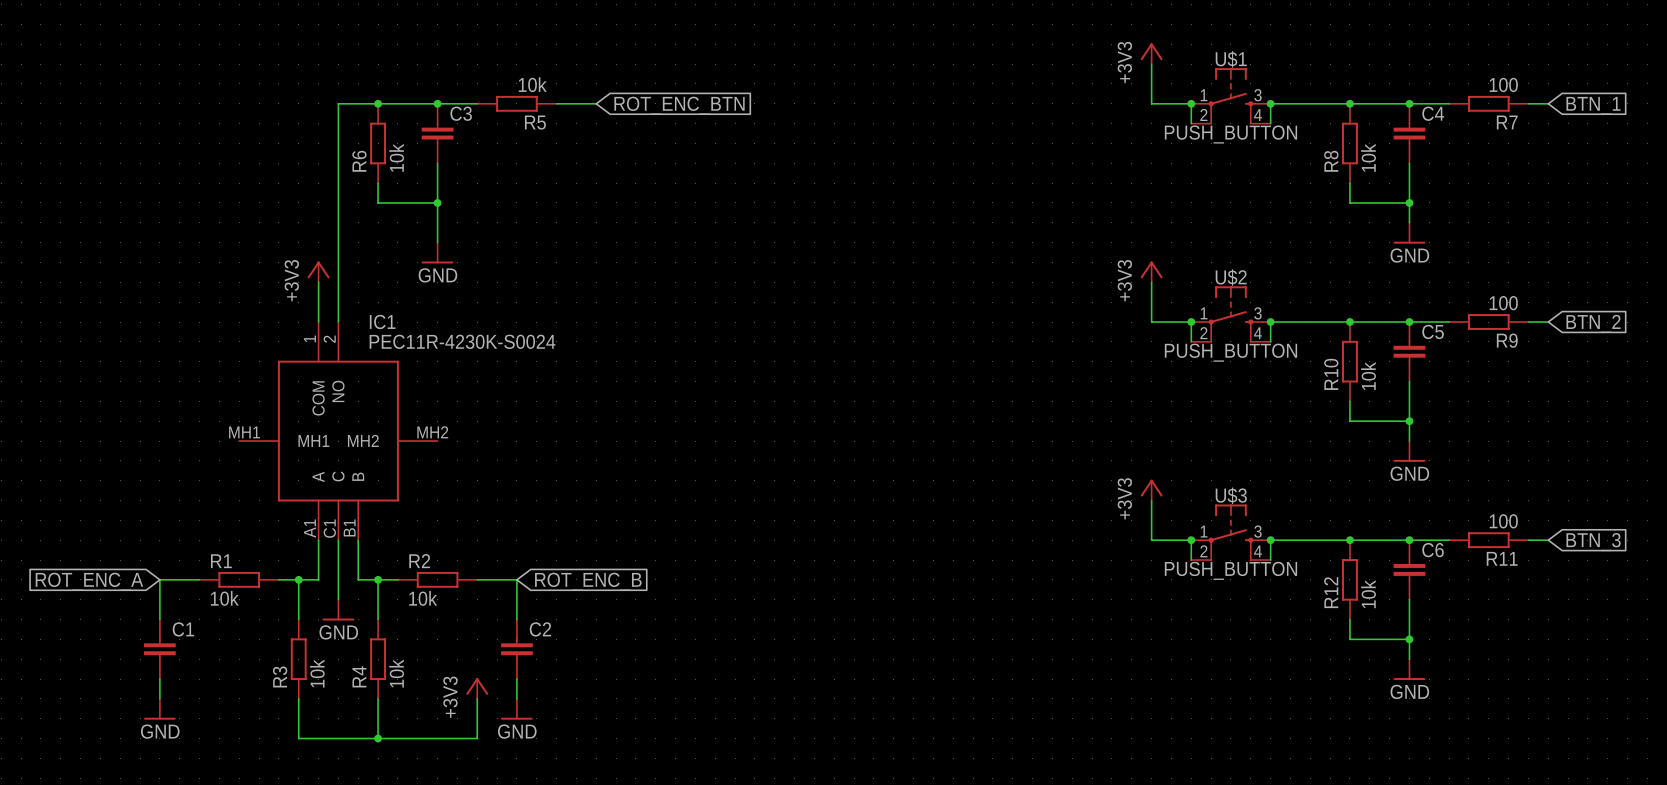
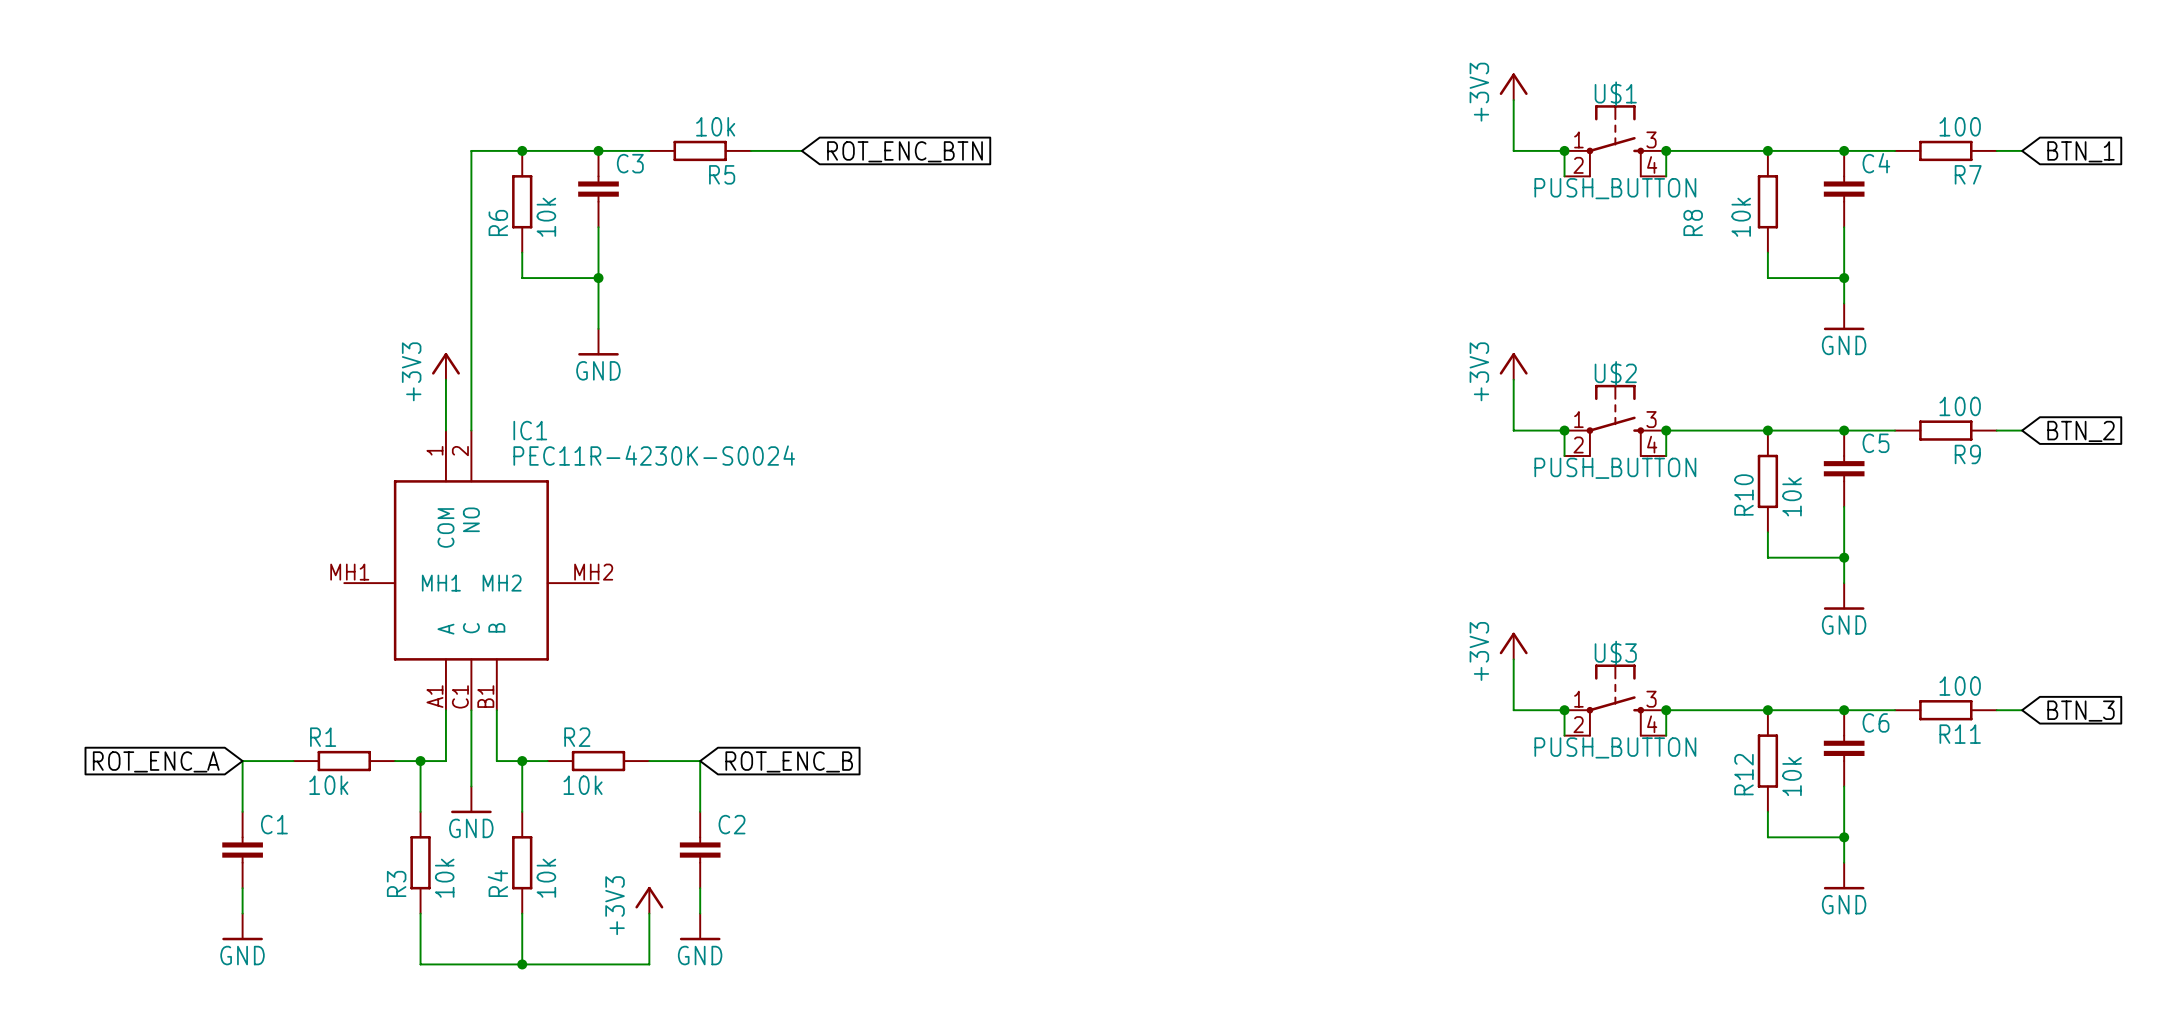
R8 value position: 10k (1368, 157) -> 10k (1741, 217)
R8 name position: R8 (1331, 161) -> R8 (1693, 222)

